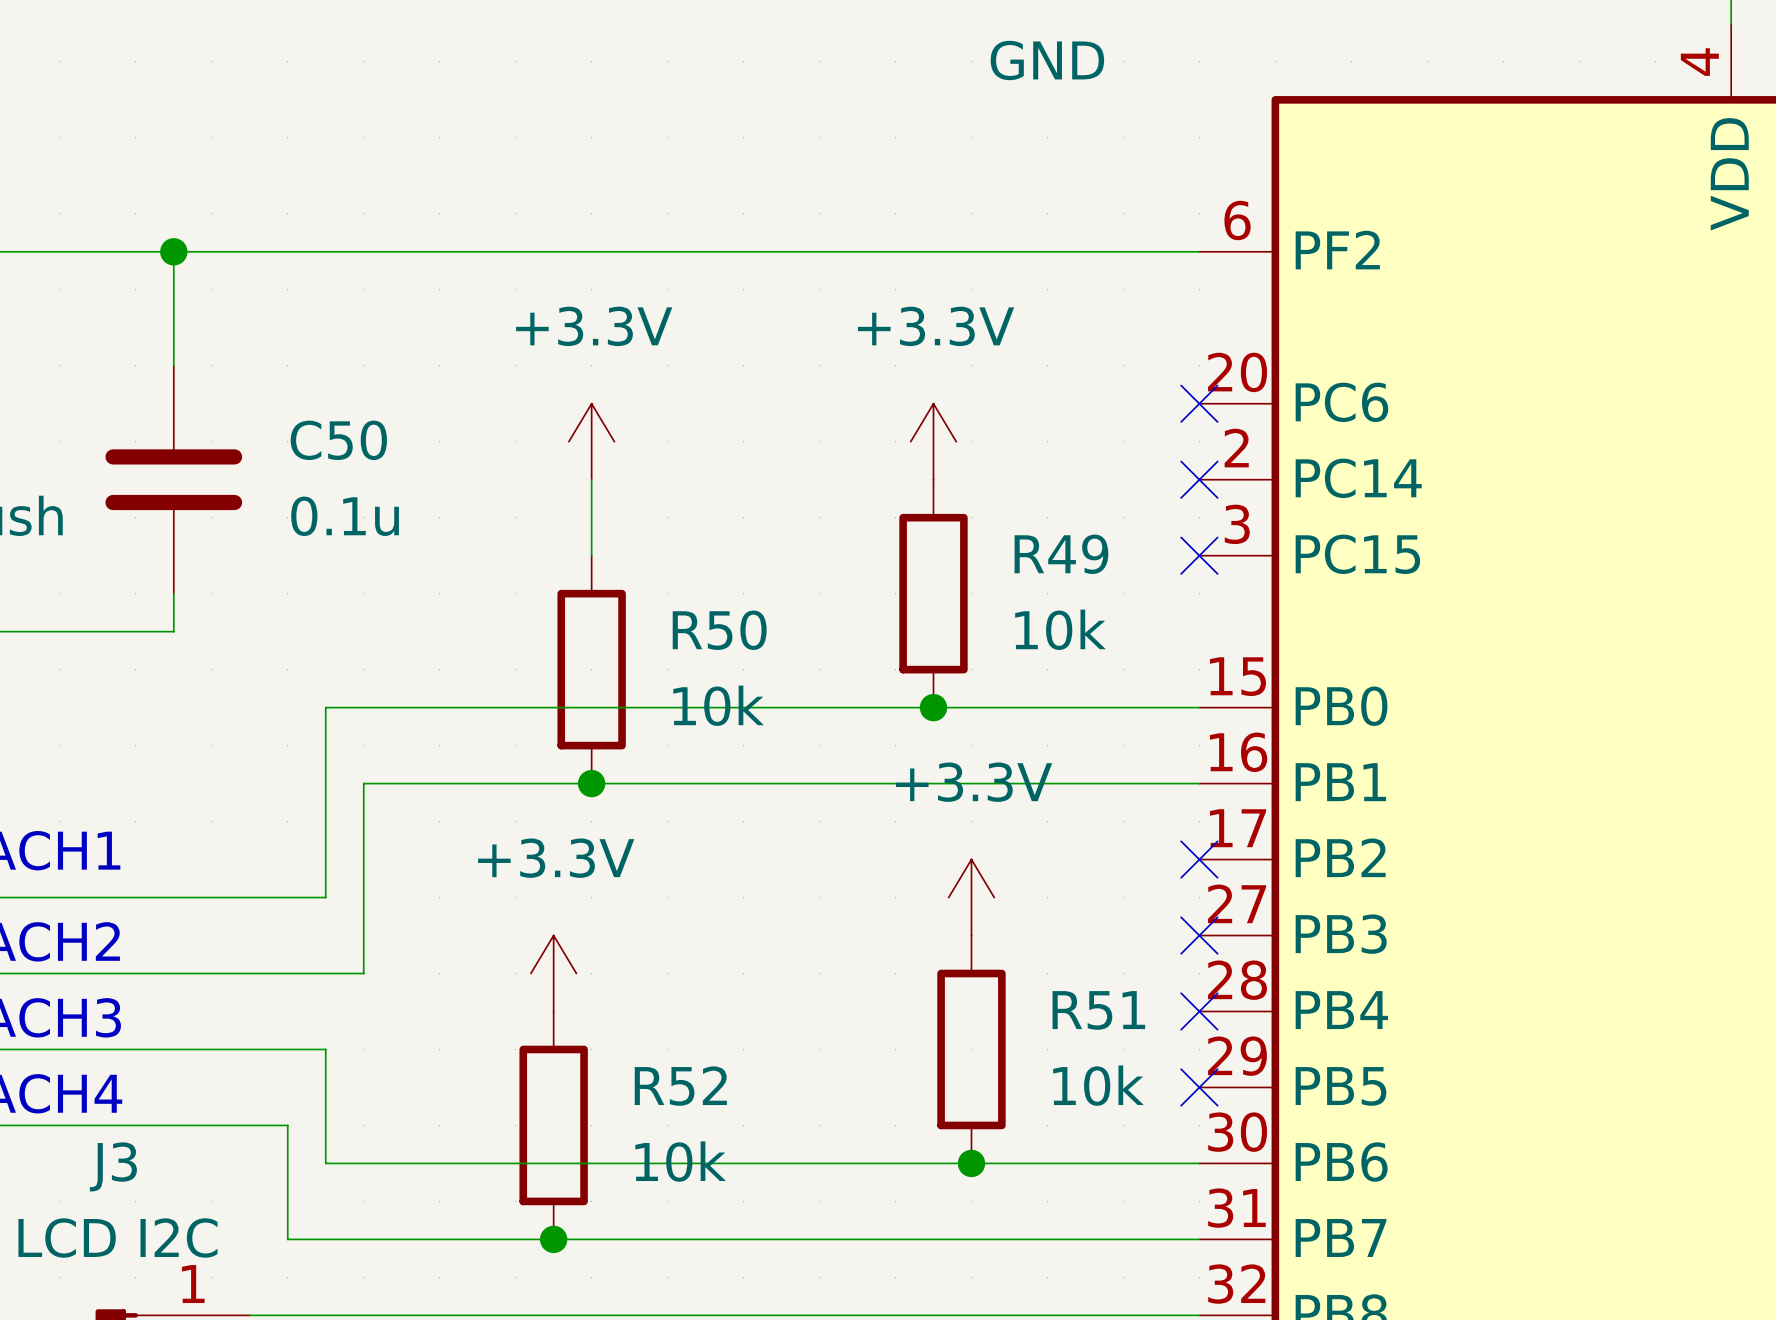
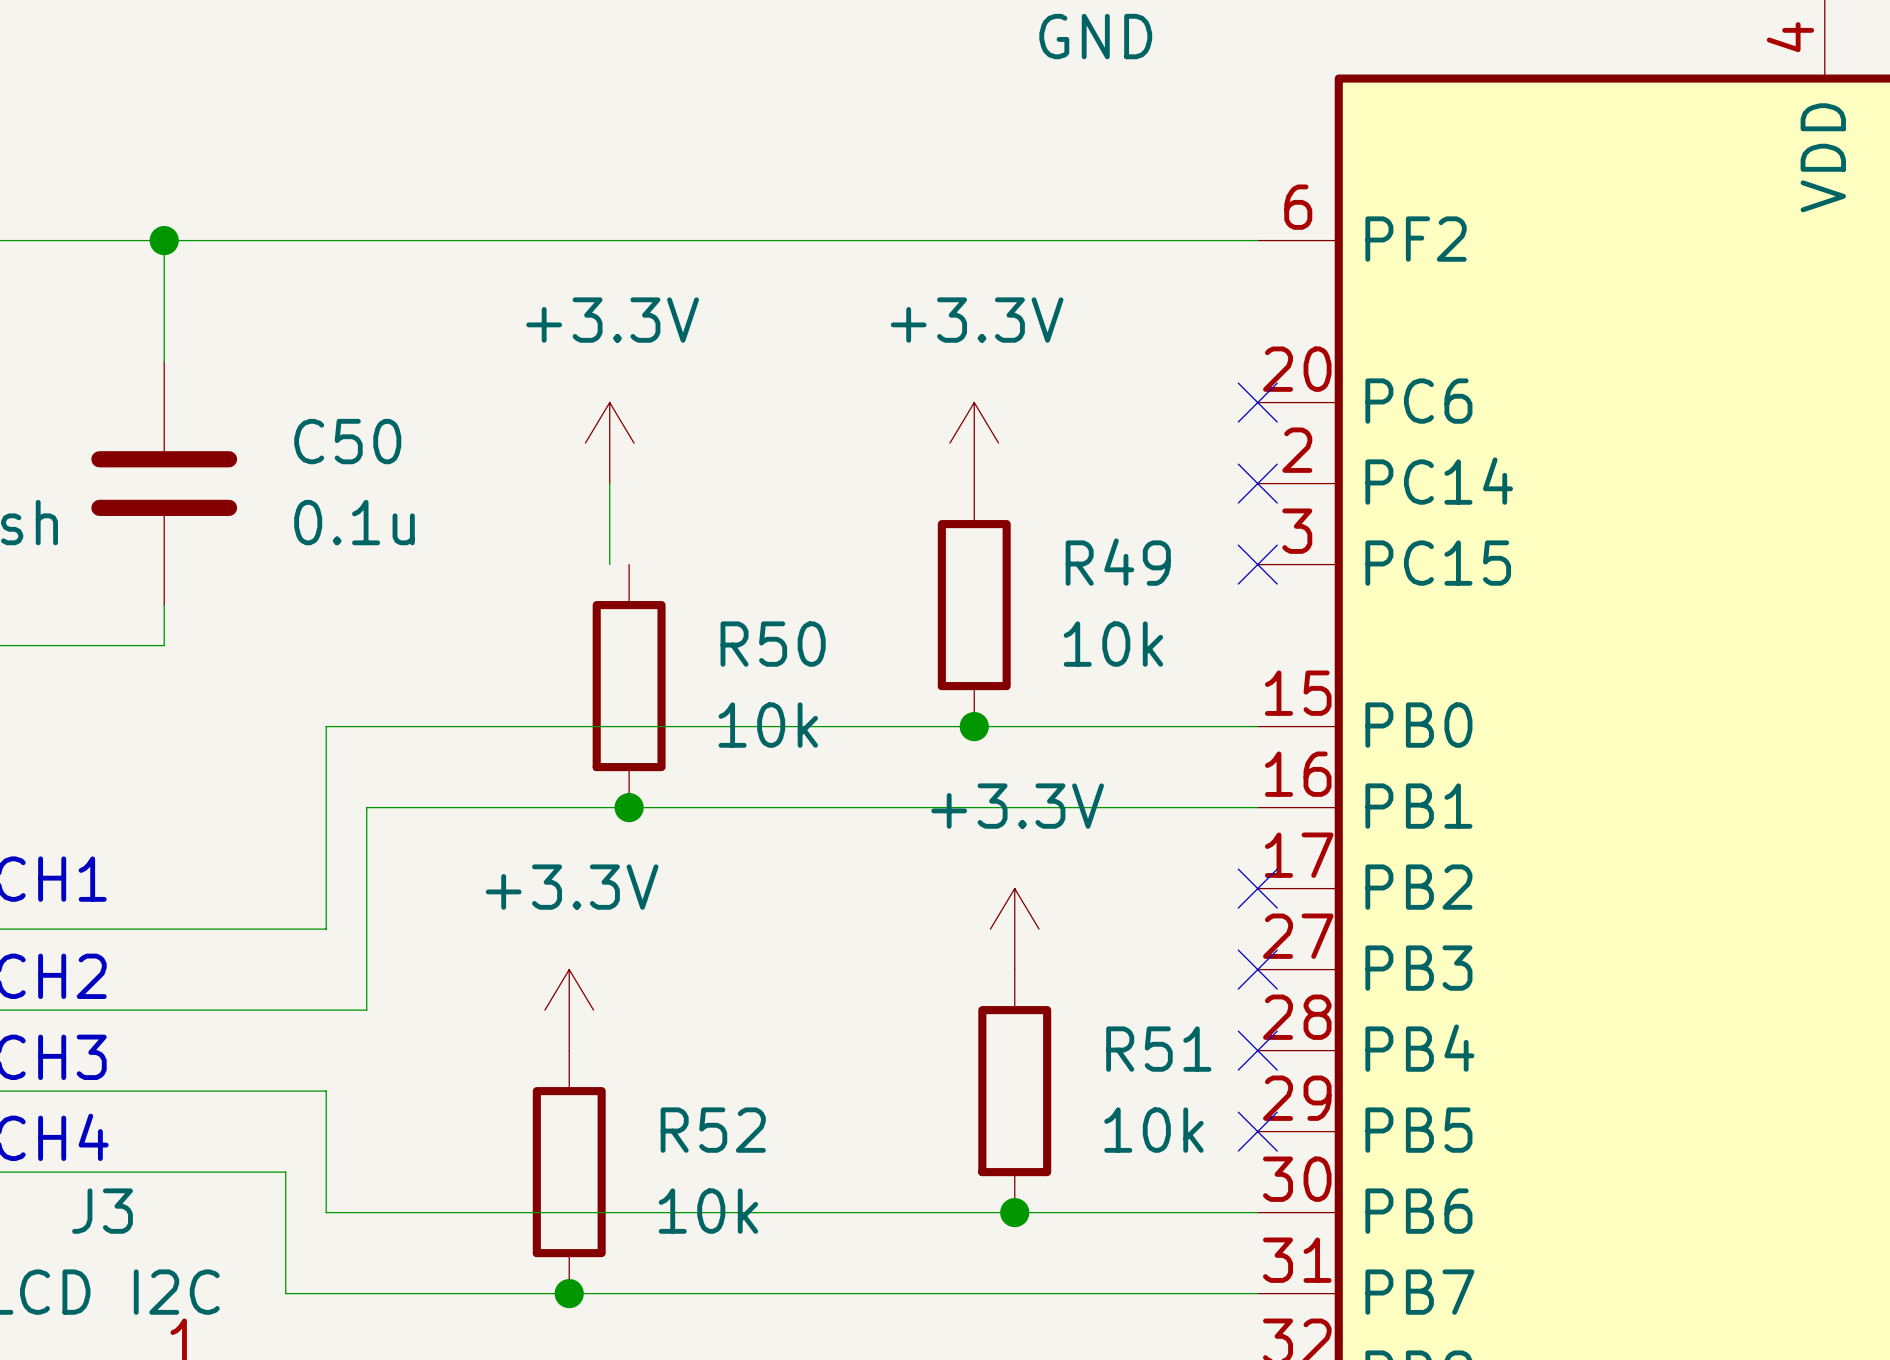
R50 position: (591, 669) -> (629, 686)
junction position: (591, 783) -> (629, 807)

